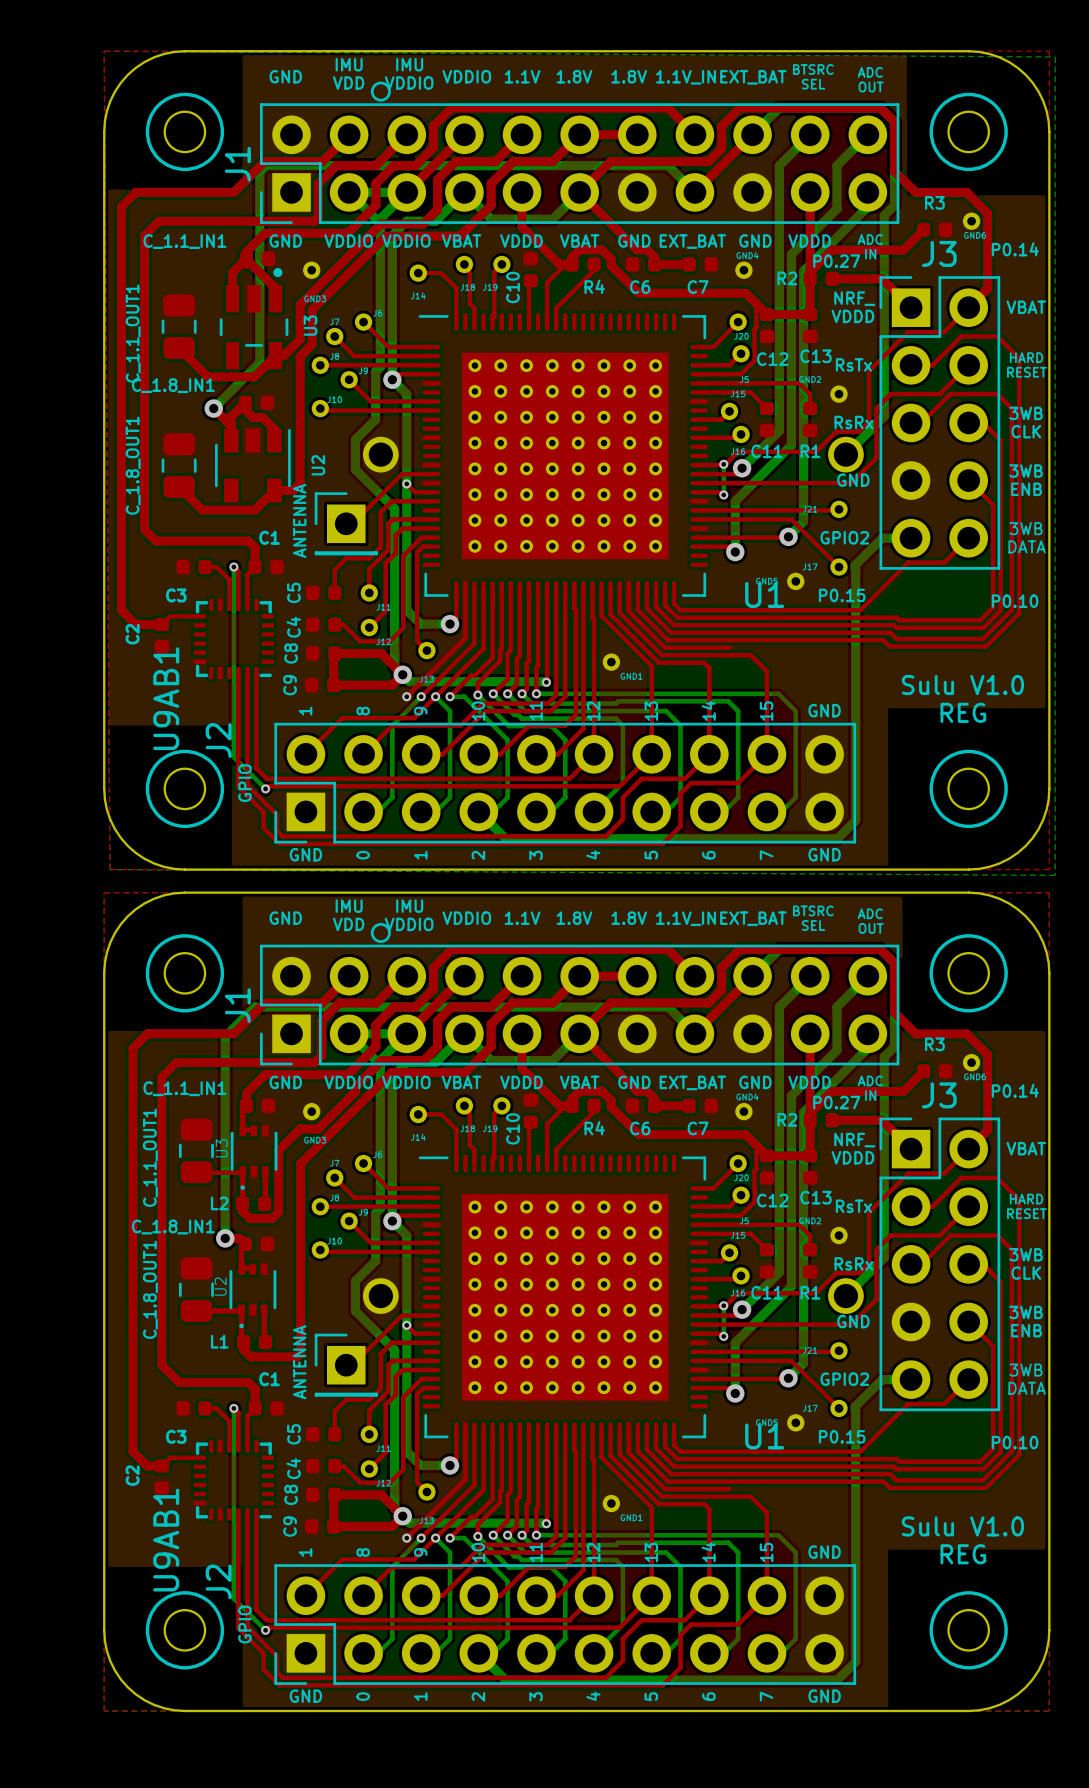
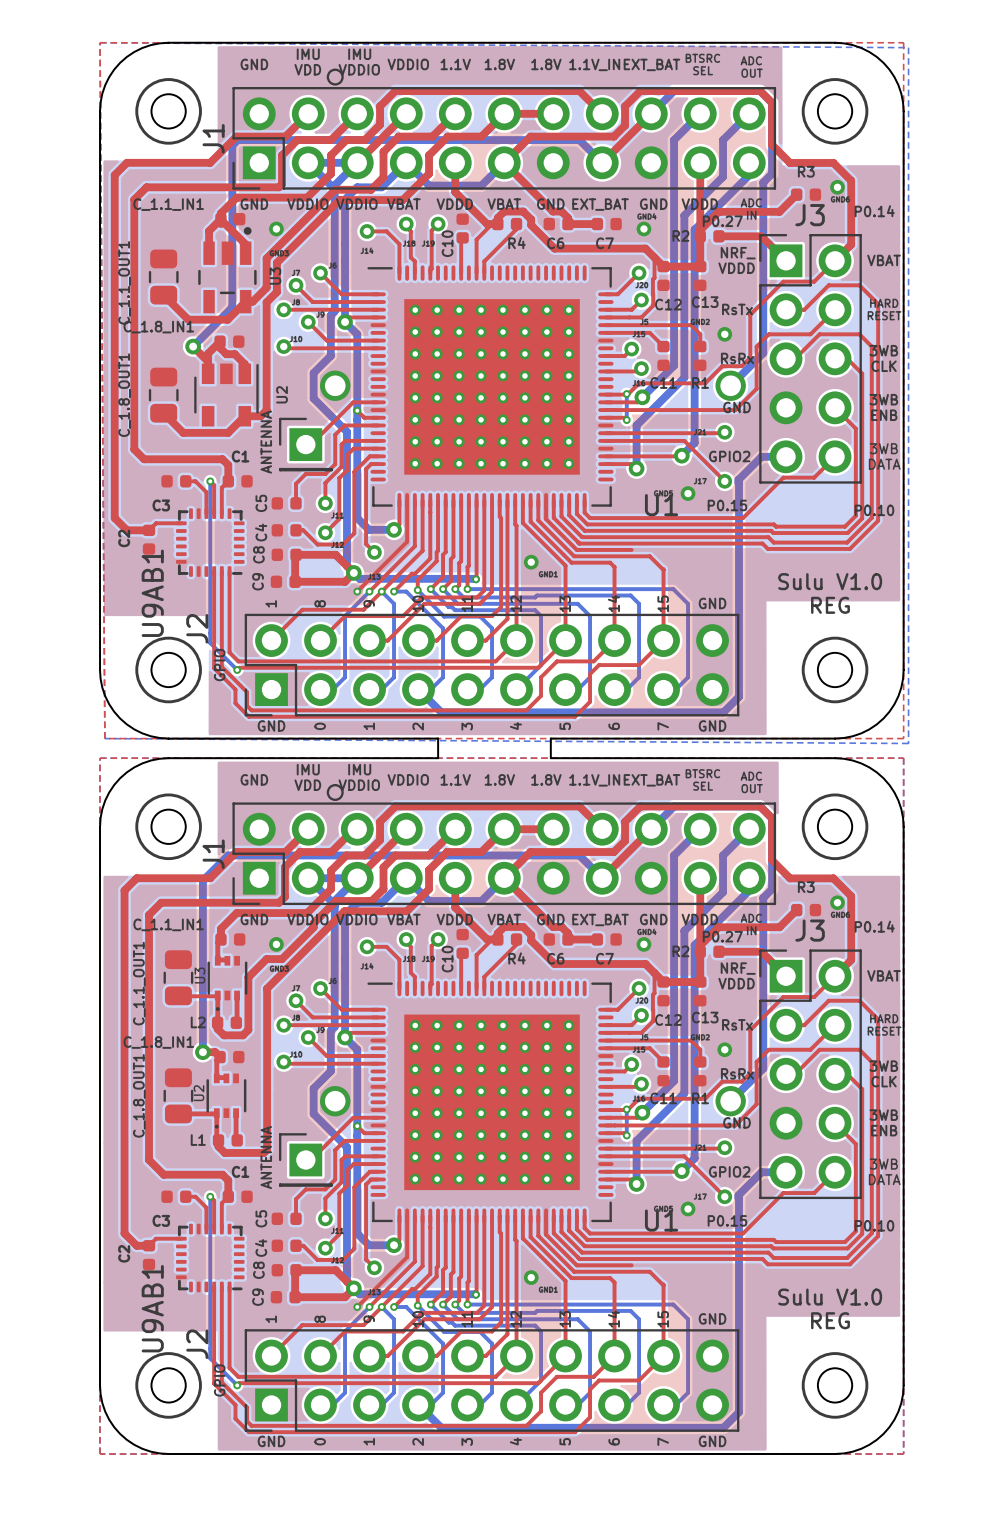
board edge: (501, 869) (634, 869) -> (438, 738) (438, 758)
board edge: (501, 892) (634, 892) -> (550, 738) (550, 758)

